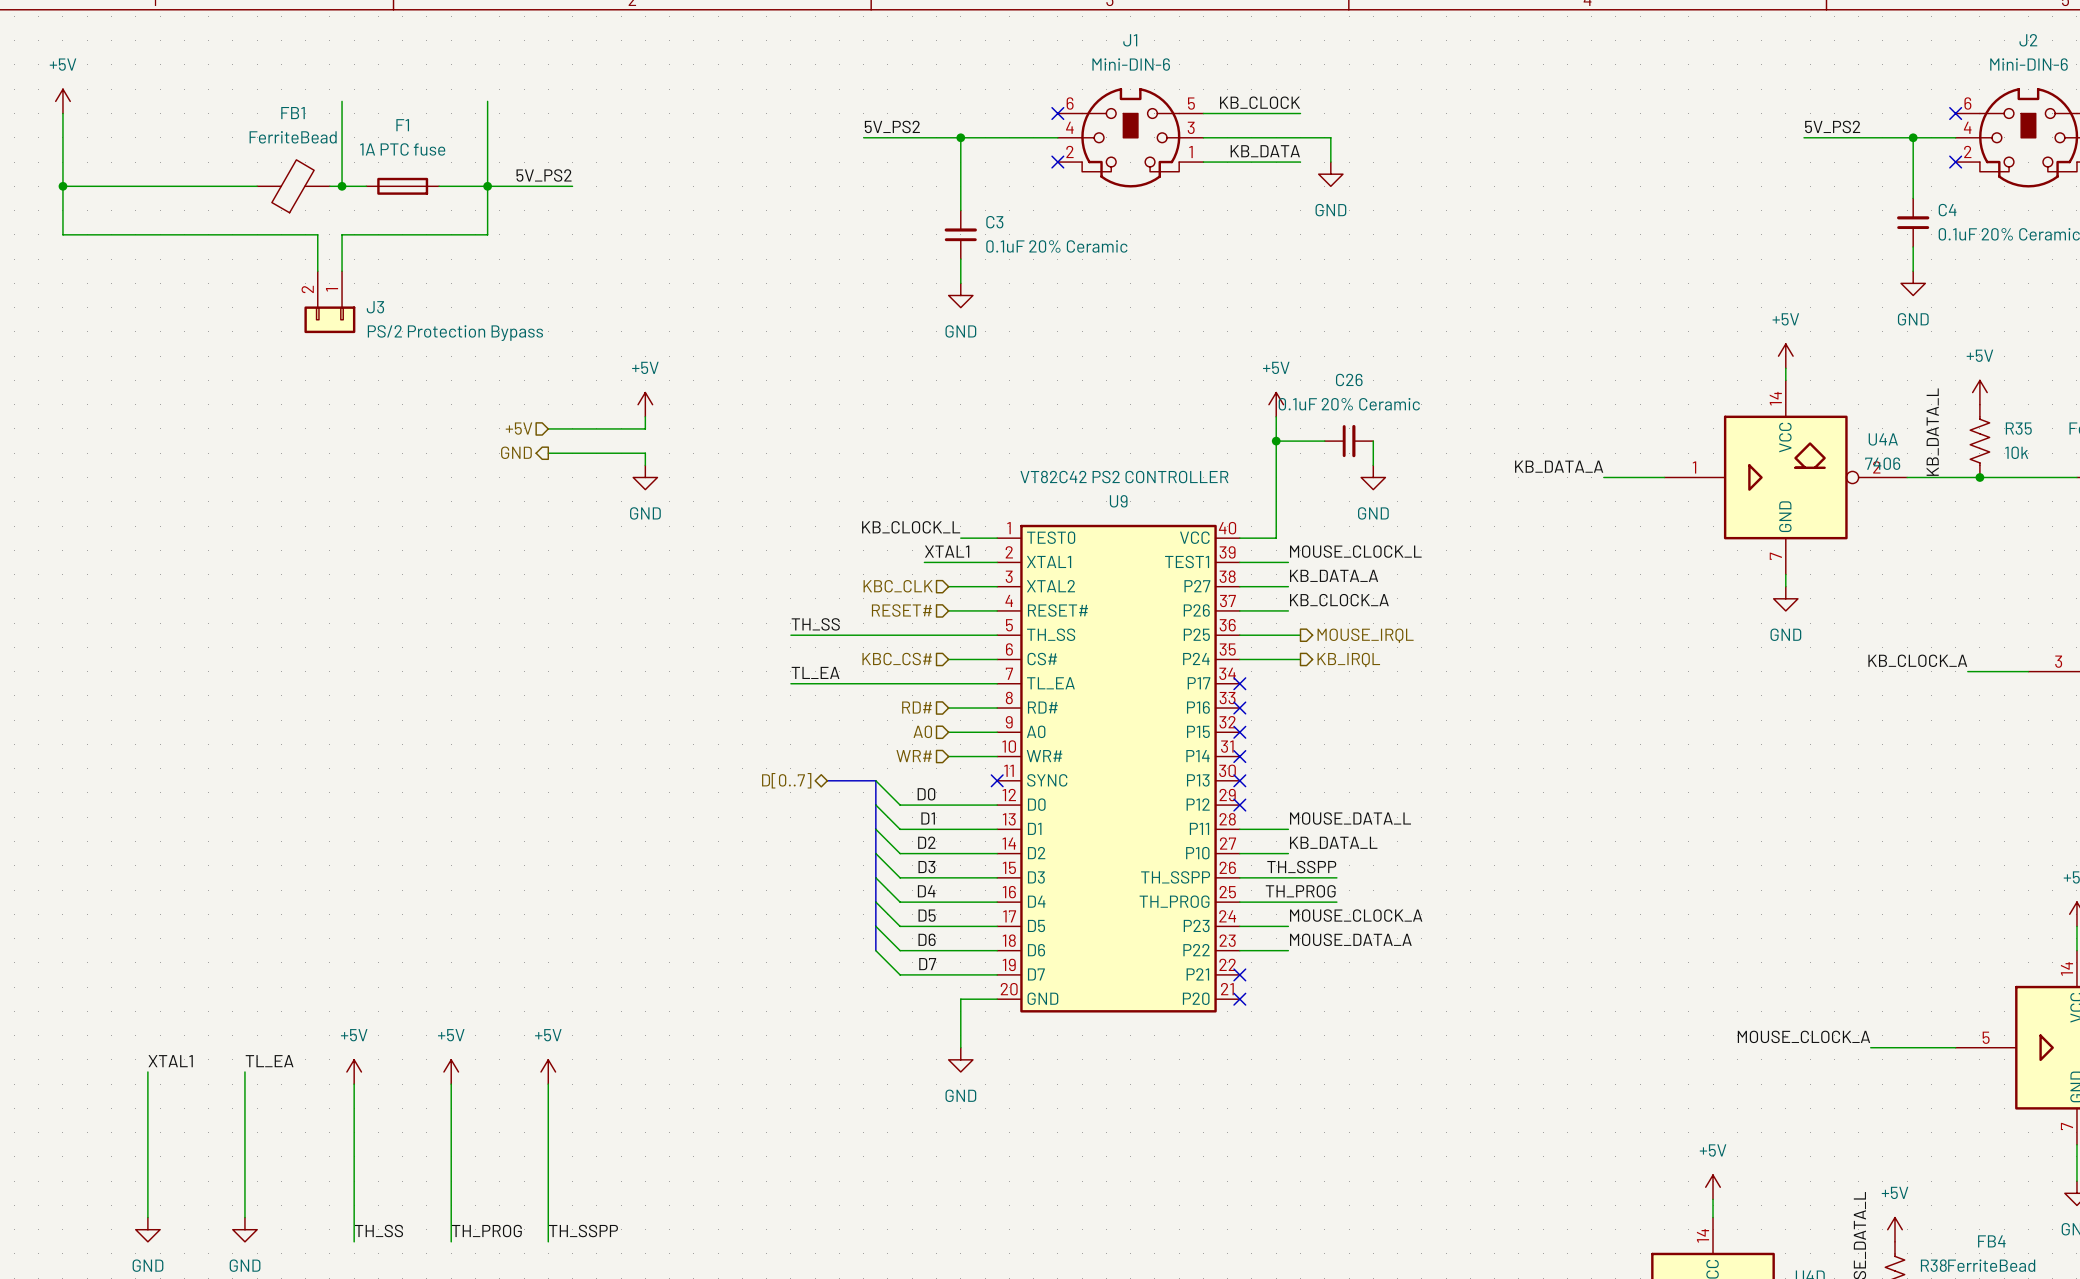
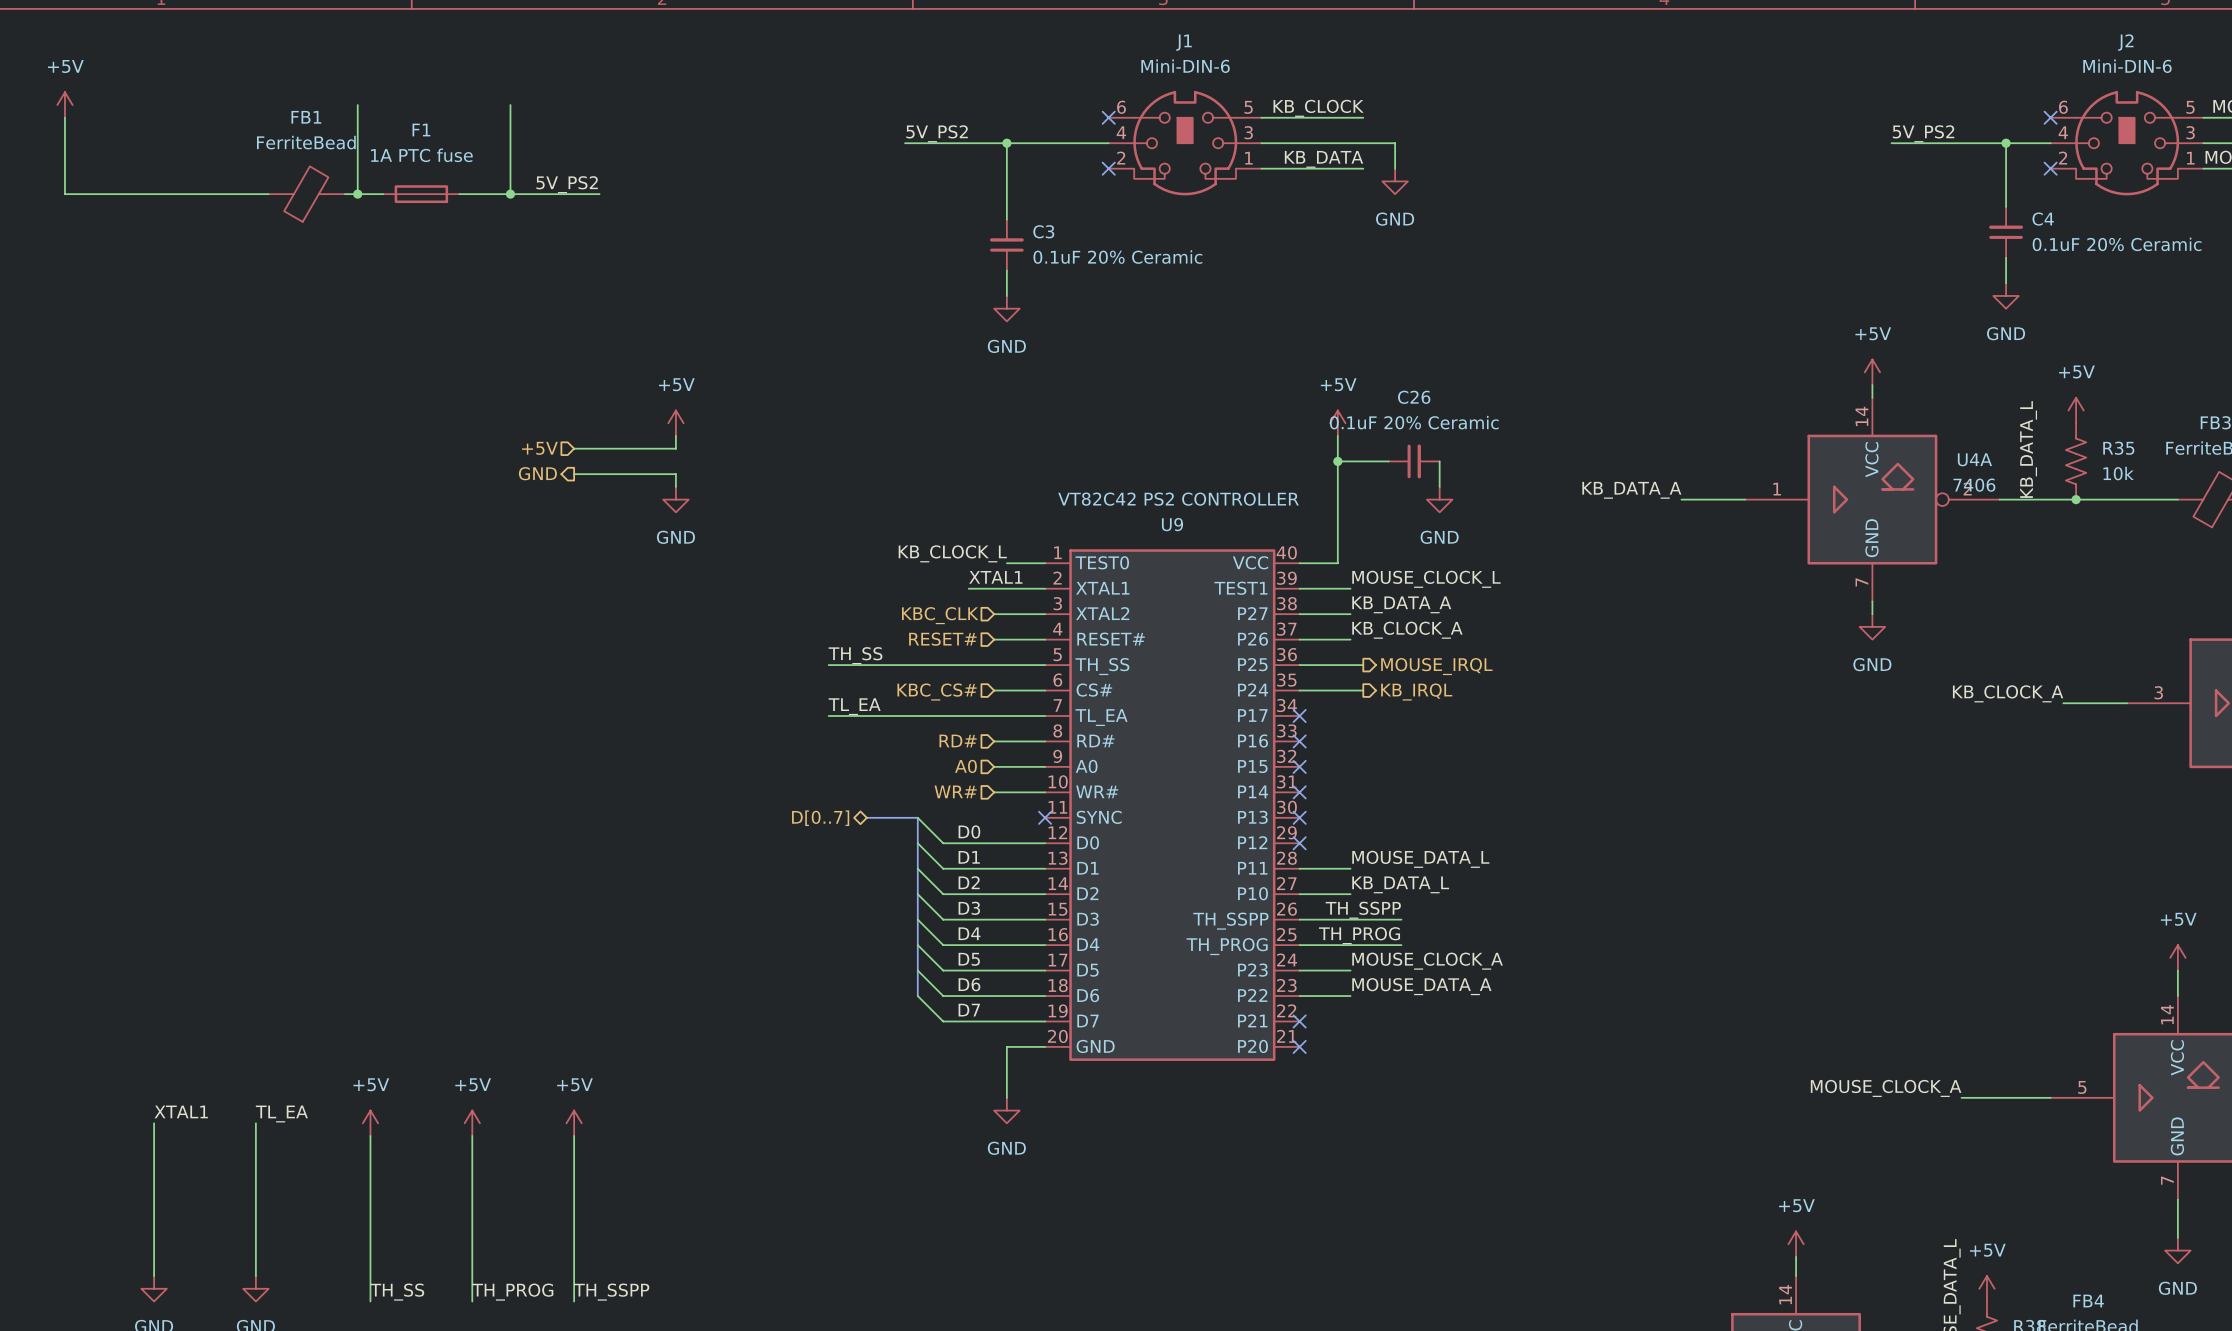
wire: (62, 186) (62, 234) (317, 234) (317, 271) -> none
junction: (62, 186) -> none
wire: (487, 186) (487, 234) (342, 234) (342, 271) -> none
J3: PS/2 Protection Bypass (329, 302) -> none

